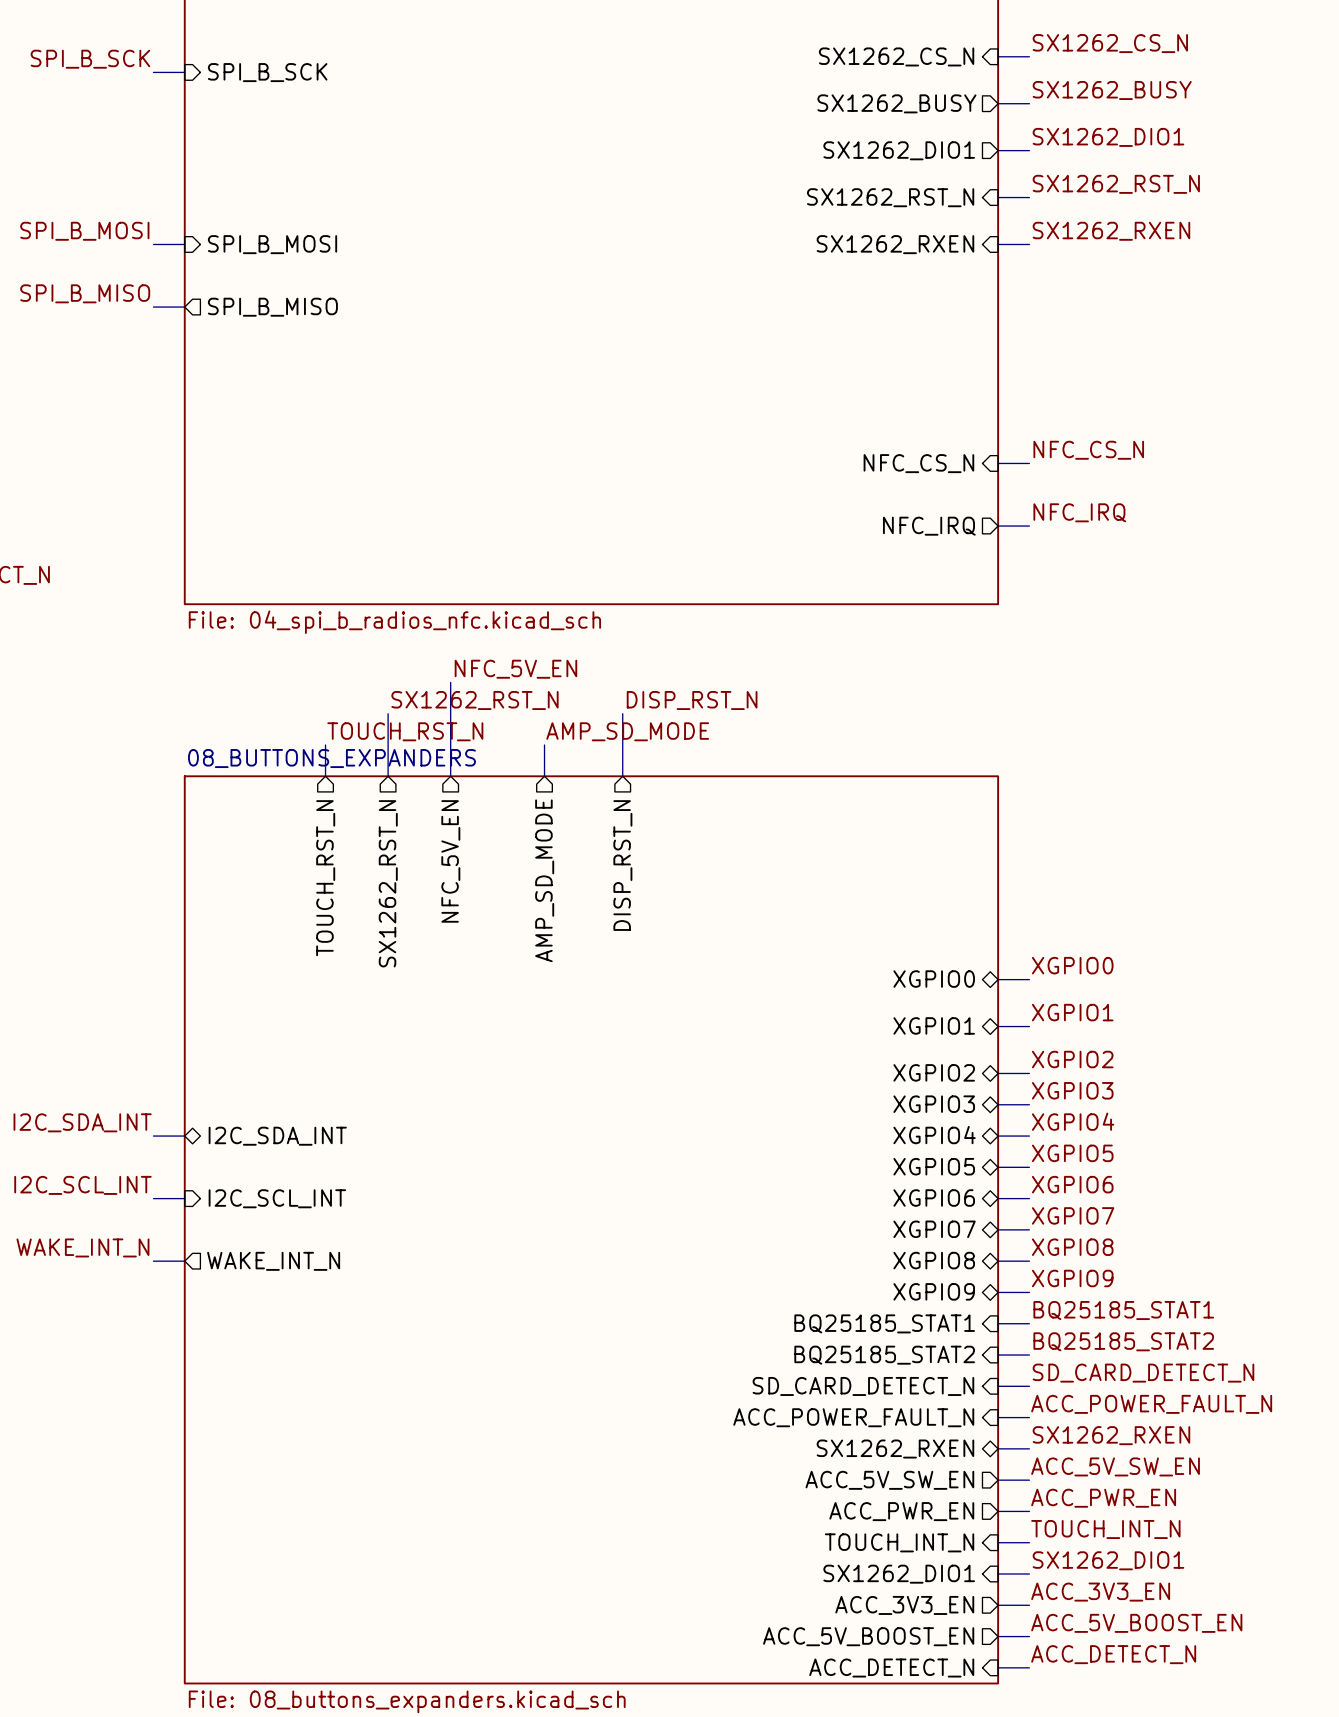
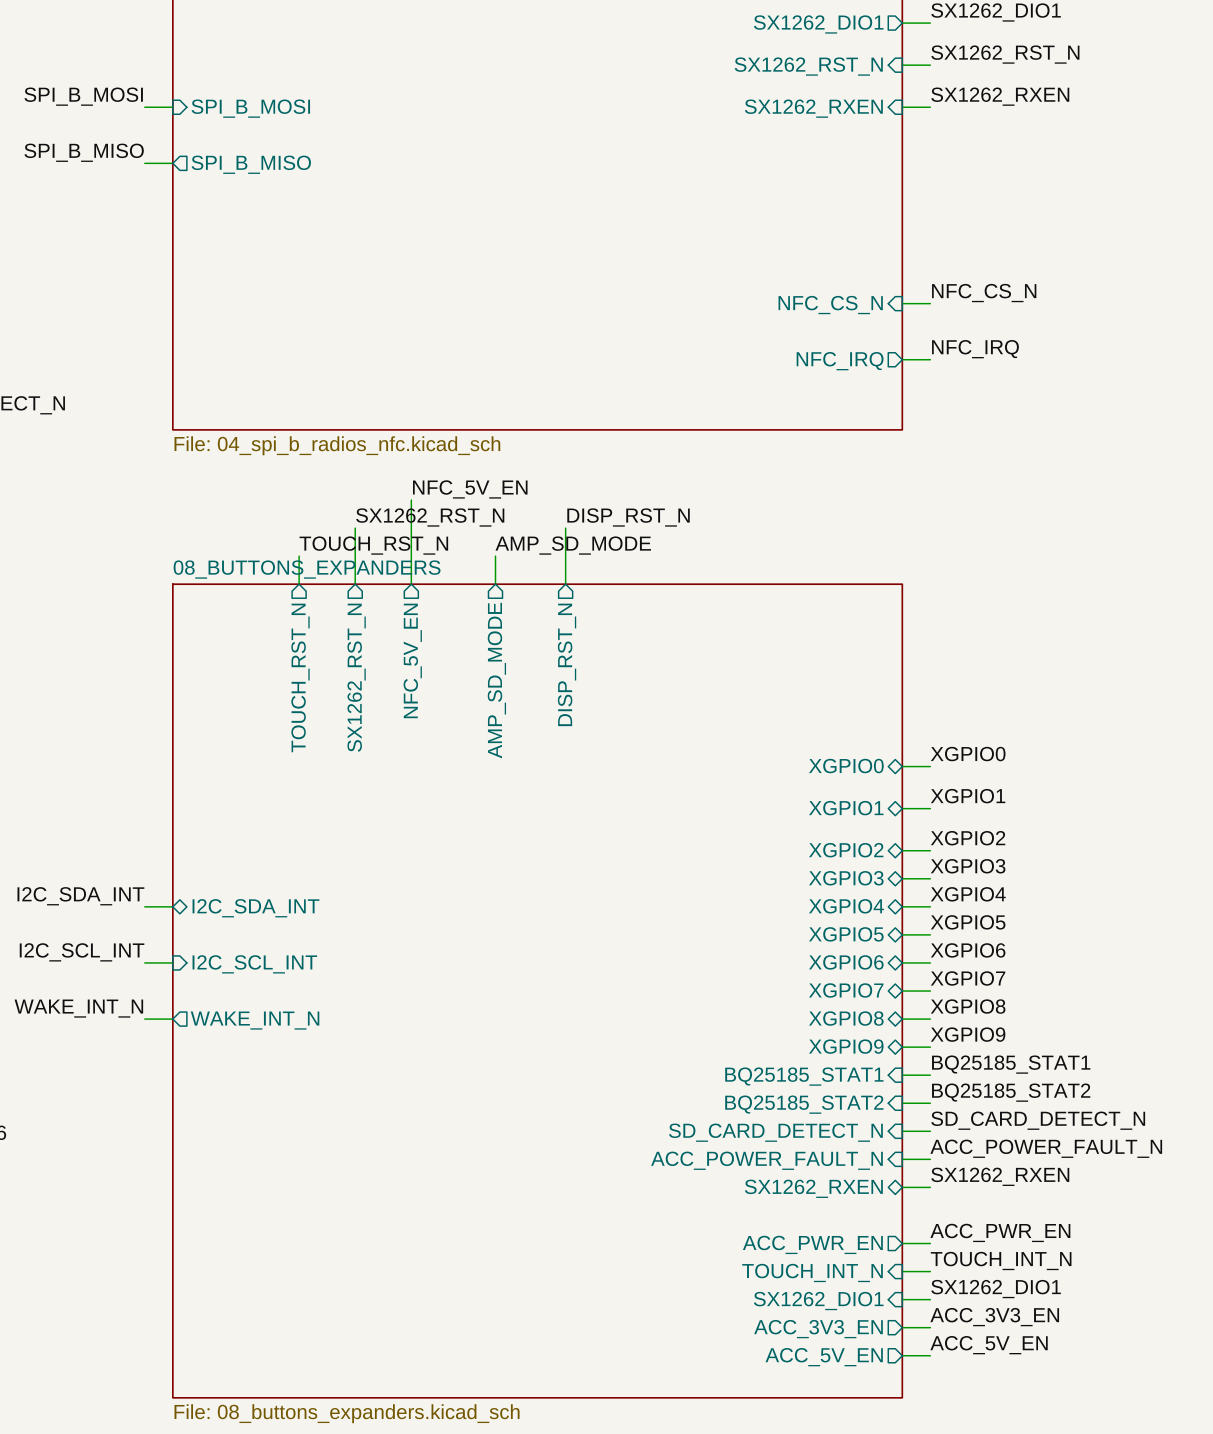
label: ACC_5V_SW_EN (1115, 1466) -> none
sheet pin: ACC_5V_SW_EN (889, 1480) -> none
wire: (998, 1480) (1029, 1480) -> none
label: ACC_5V_BOOST_EN (1136, 1623) -> ACC_5V_EN (989, 1345)
sheet pin: ACC_5V_BOOST_EN (868, 1636) -> ACC_5V_EN (824, 1357)
label: ACC_DETECT_N (1113, 1654) -> none
wire: (998, 1667) (1029, 1667) -> none
sheet pin: ACC_DETECT_N (891, 1668) -> none

